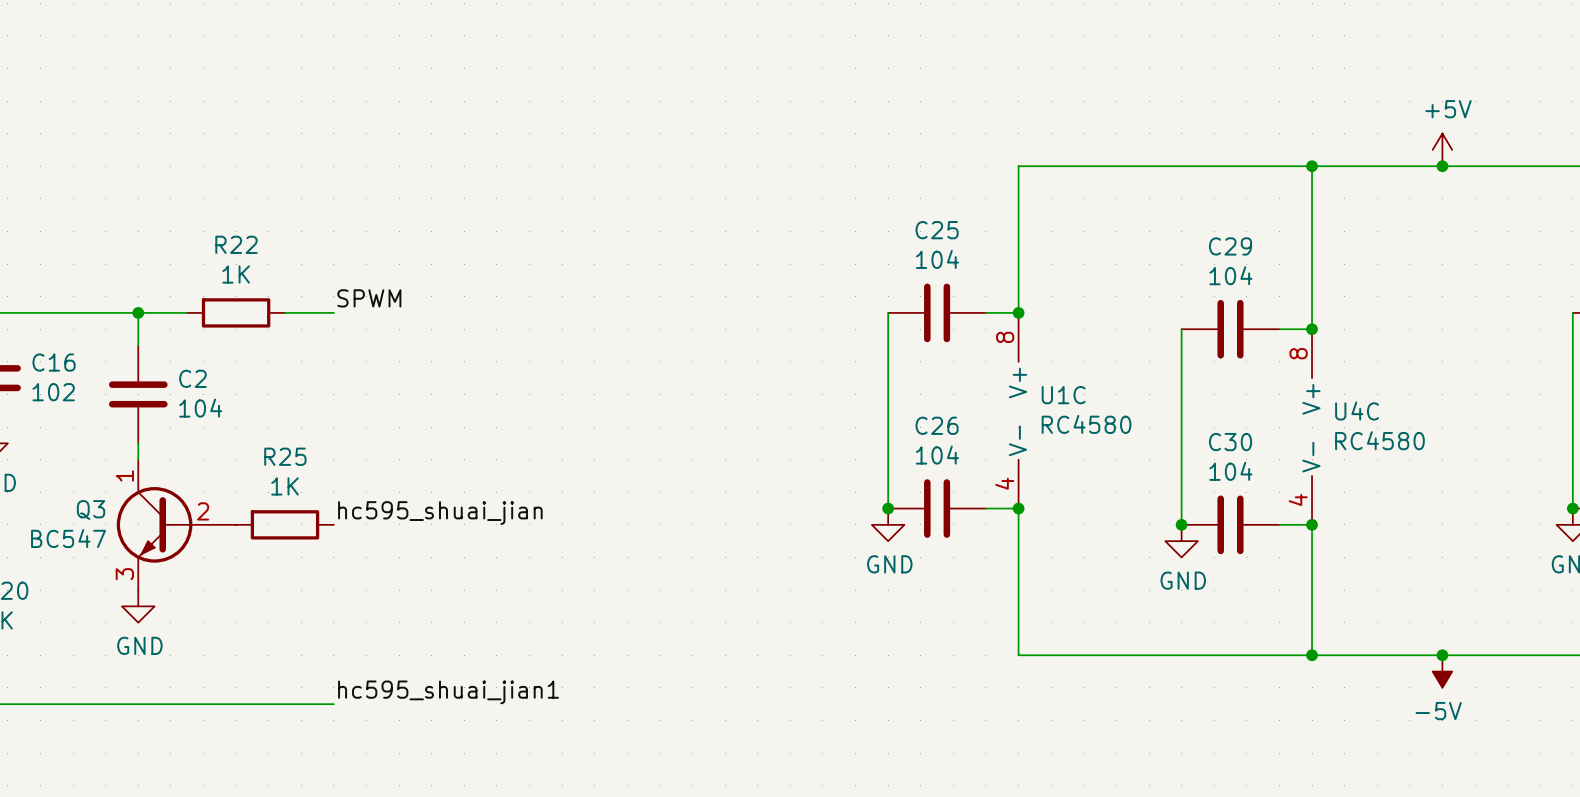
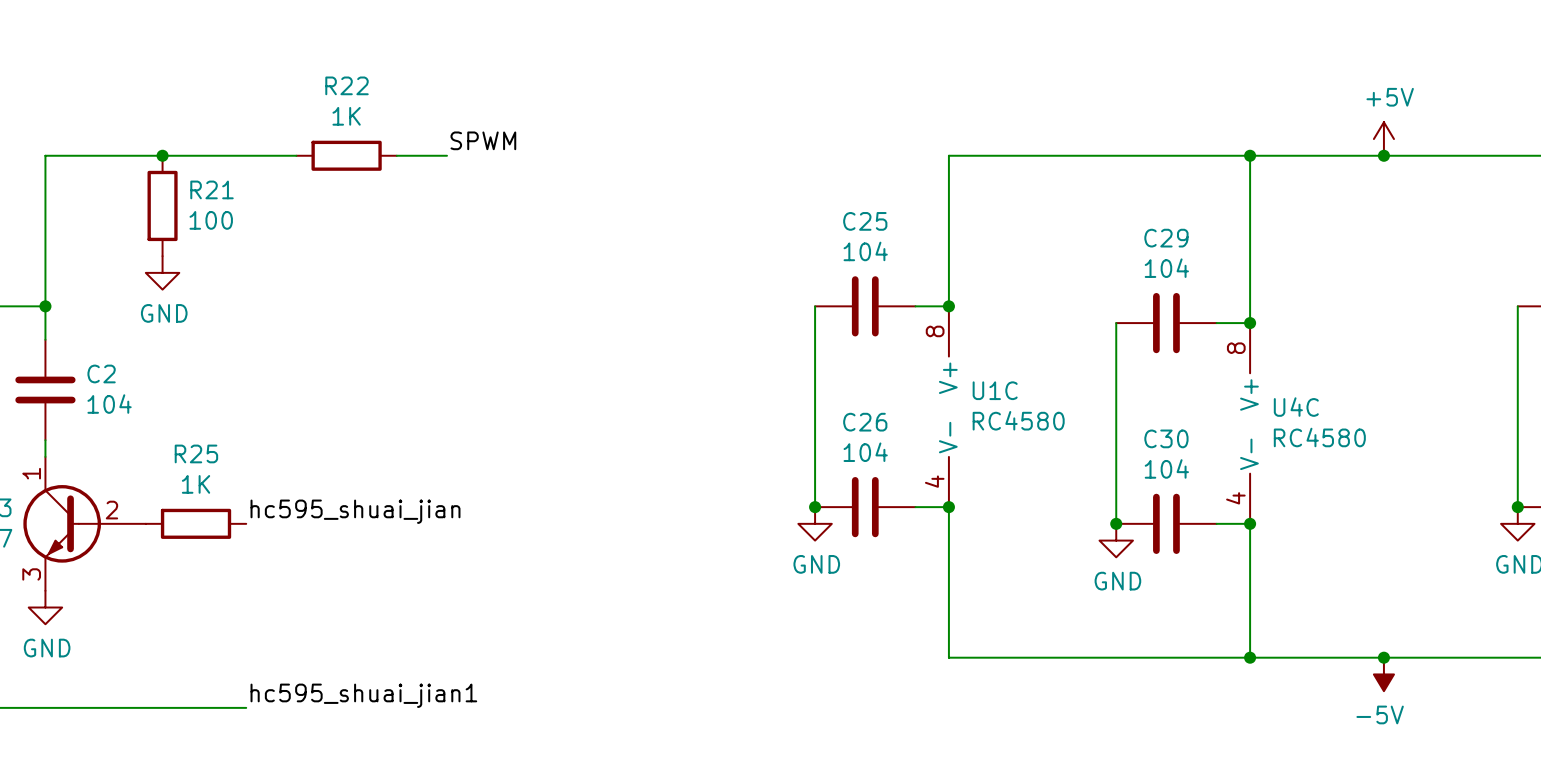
junction: none -> (162, 155)
R21: none -> 100 (162, 205)
power symbol: none -> GND (162, 272)
label position: SPWM (369, 298) -> SPWM (483, 140)
wire: (138, 312) (187, 312) -> (45, 306) (45, 155) (296, 155)
R22 position: (236, 312) -> (346, 155)
wire: (285, 312) (333, 312) -> (396, 155) (446, 155)

